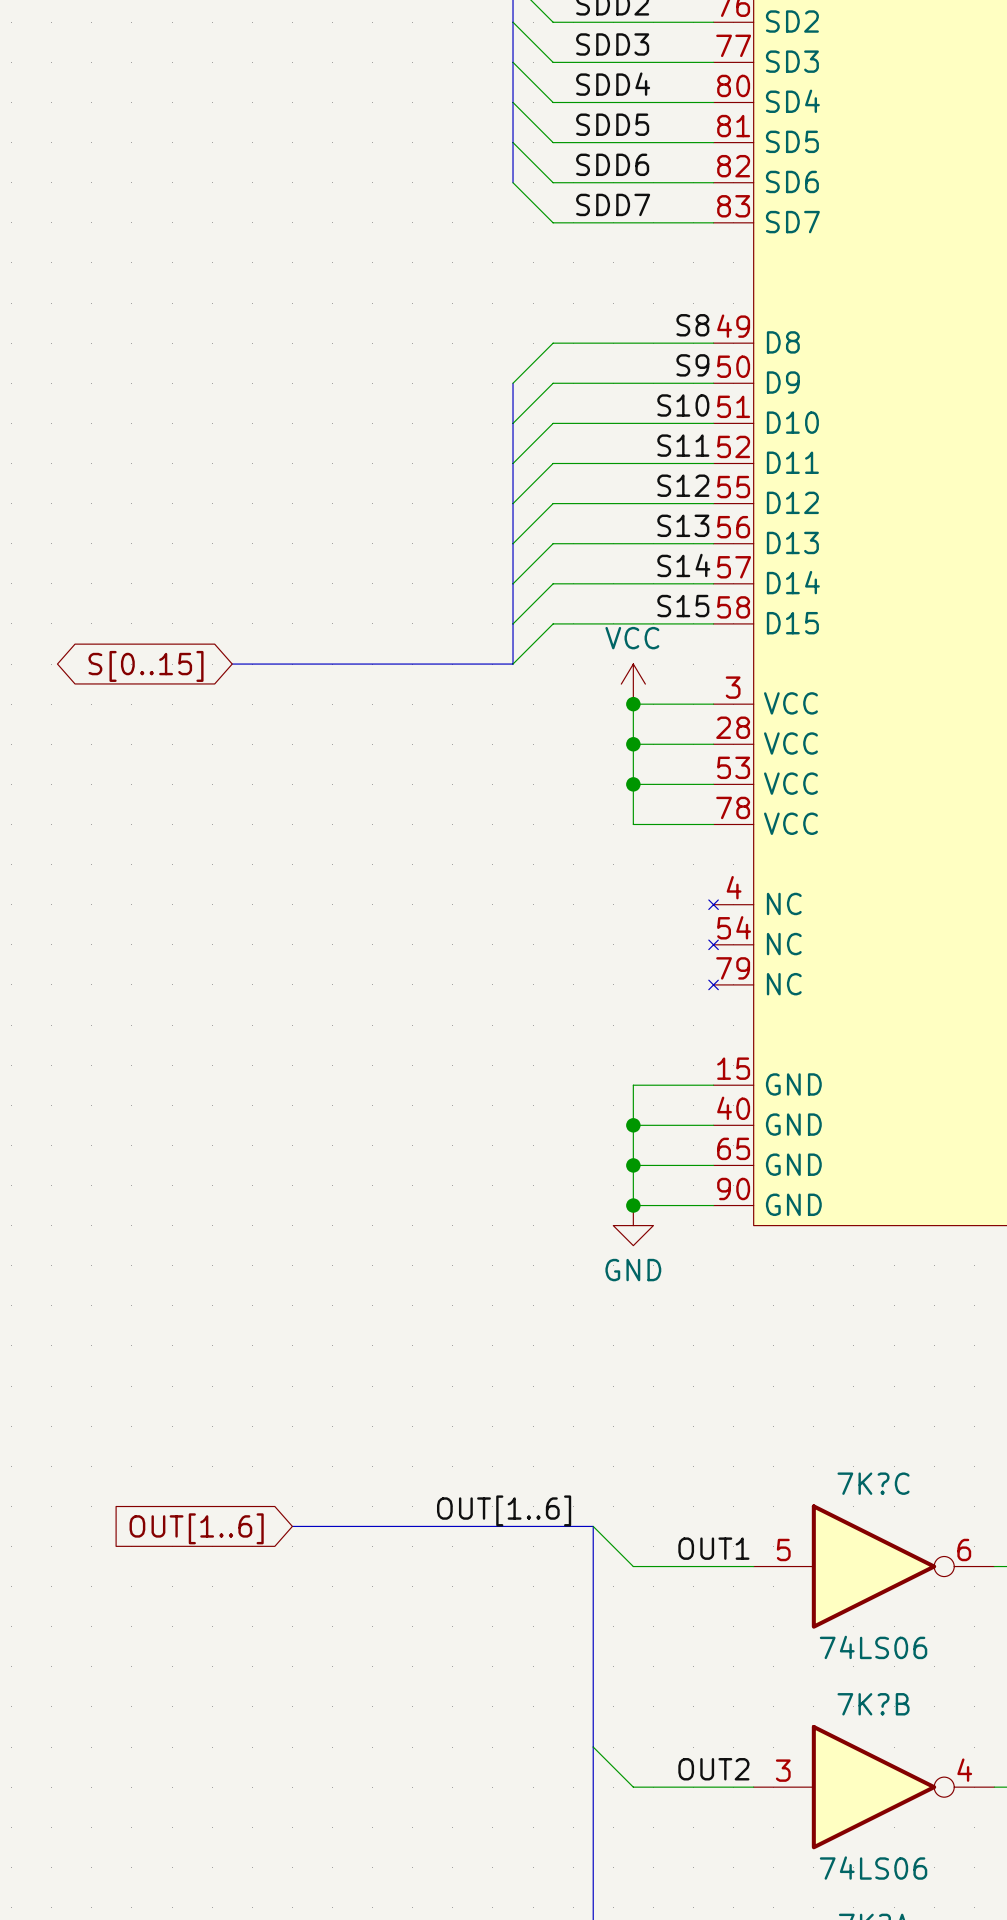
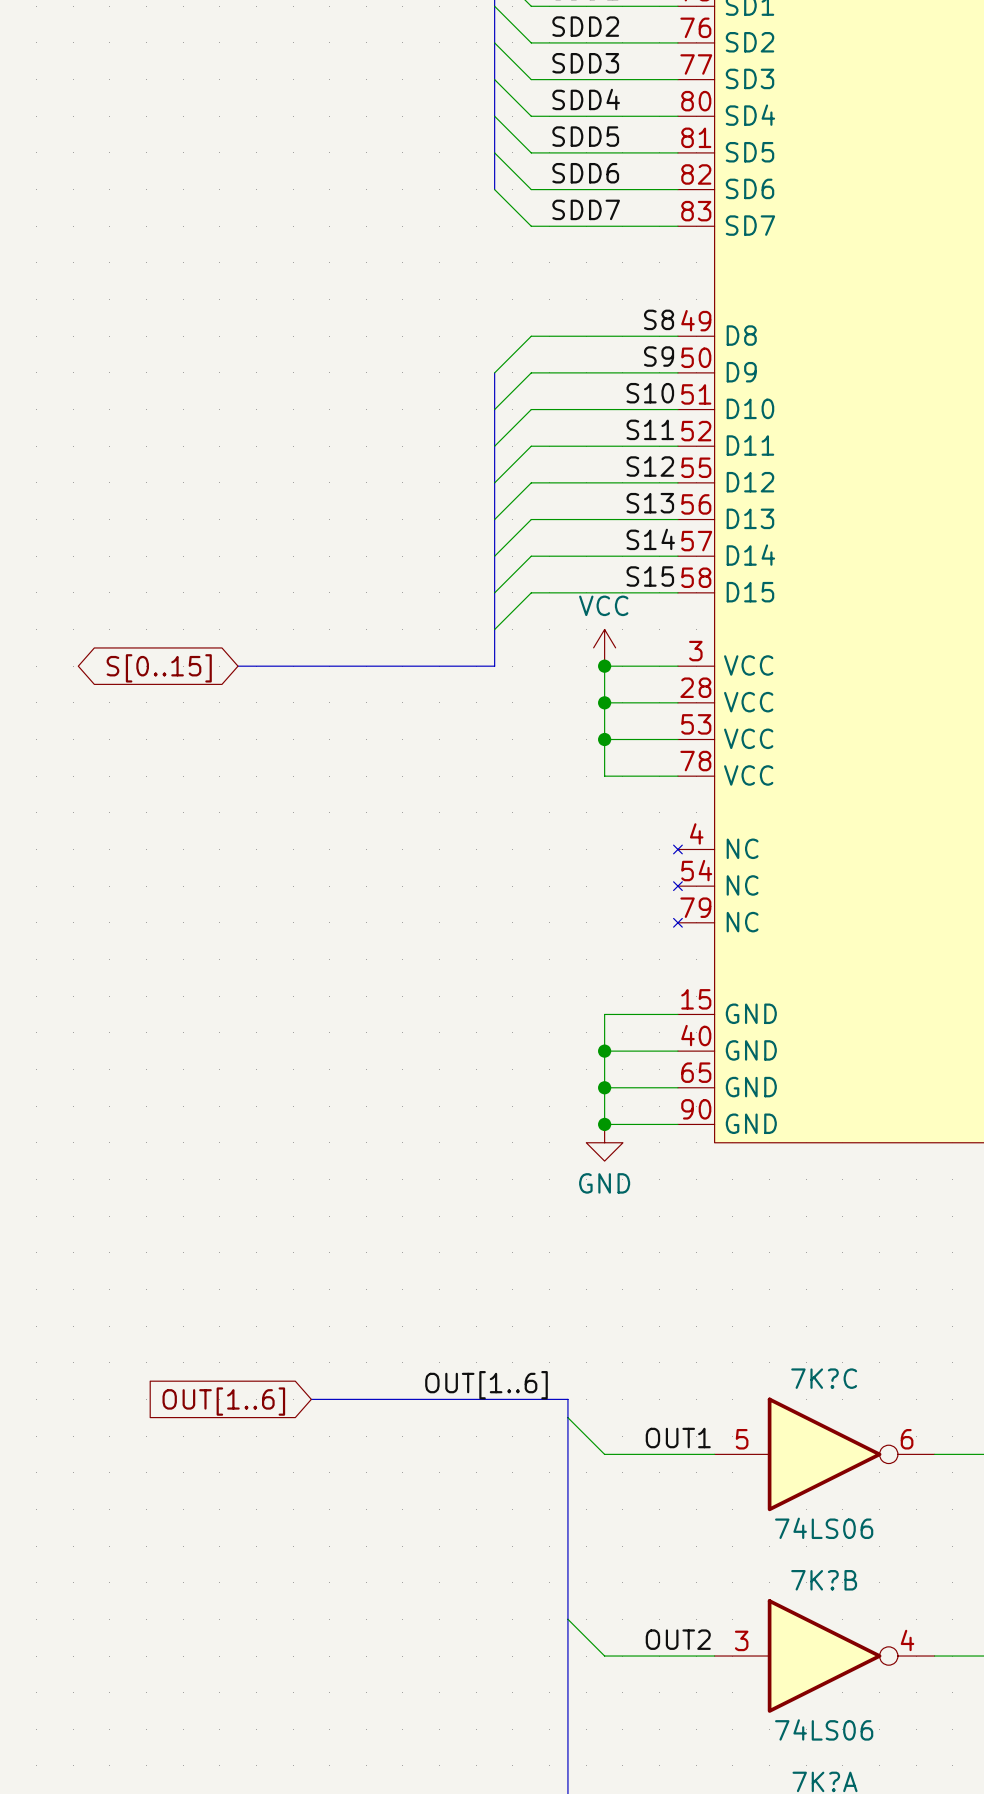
bus: (232, 664) (513, 664) -> (238, 666) (494, 666) (494, 629)
global label position: S[0..15] (146, 666) -> S[0..15] (159, 668)
label position: OUT[1..6] (504, 1510) -> OUT[1..6] (486, 1385)
bus: (292, 1526) (593, 1526) -> (311, 1399) (567, 1399) (567, 1417)
global label position: OUT[1..6] (196, 1528) -> OUT[1..6] (223, 1401)

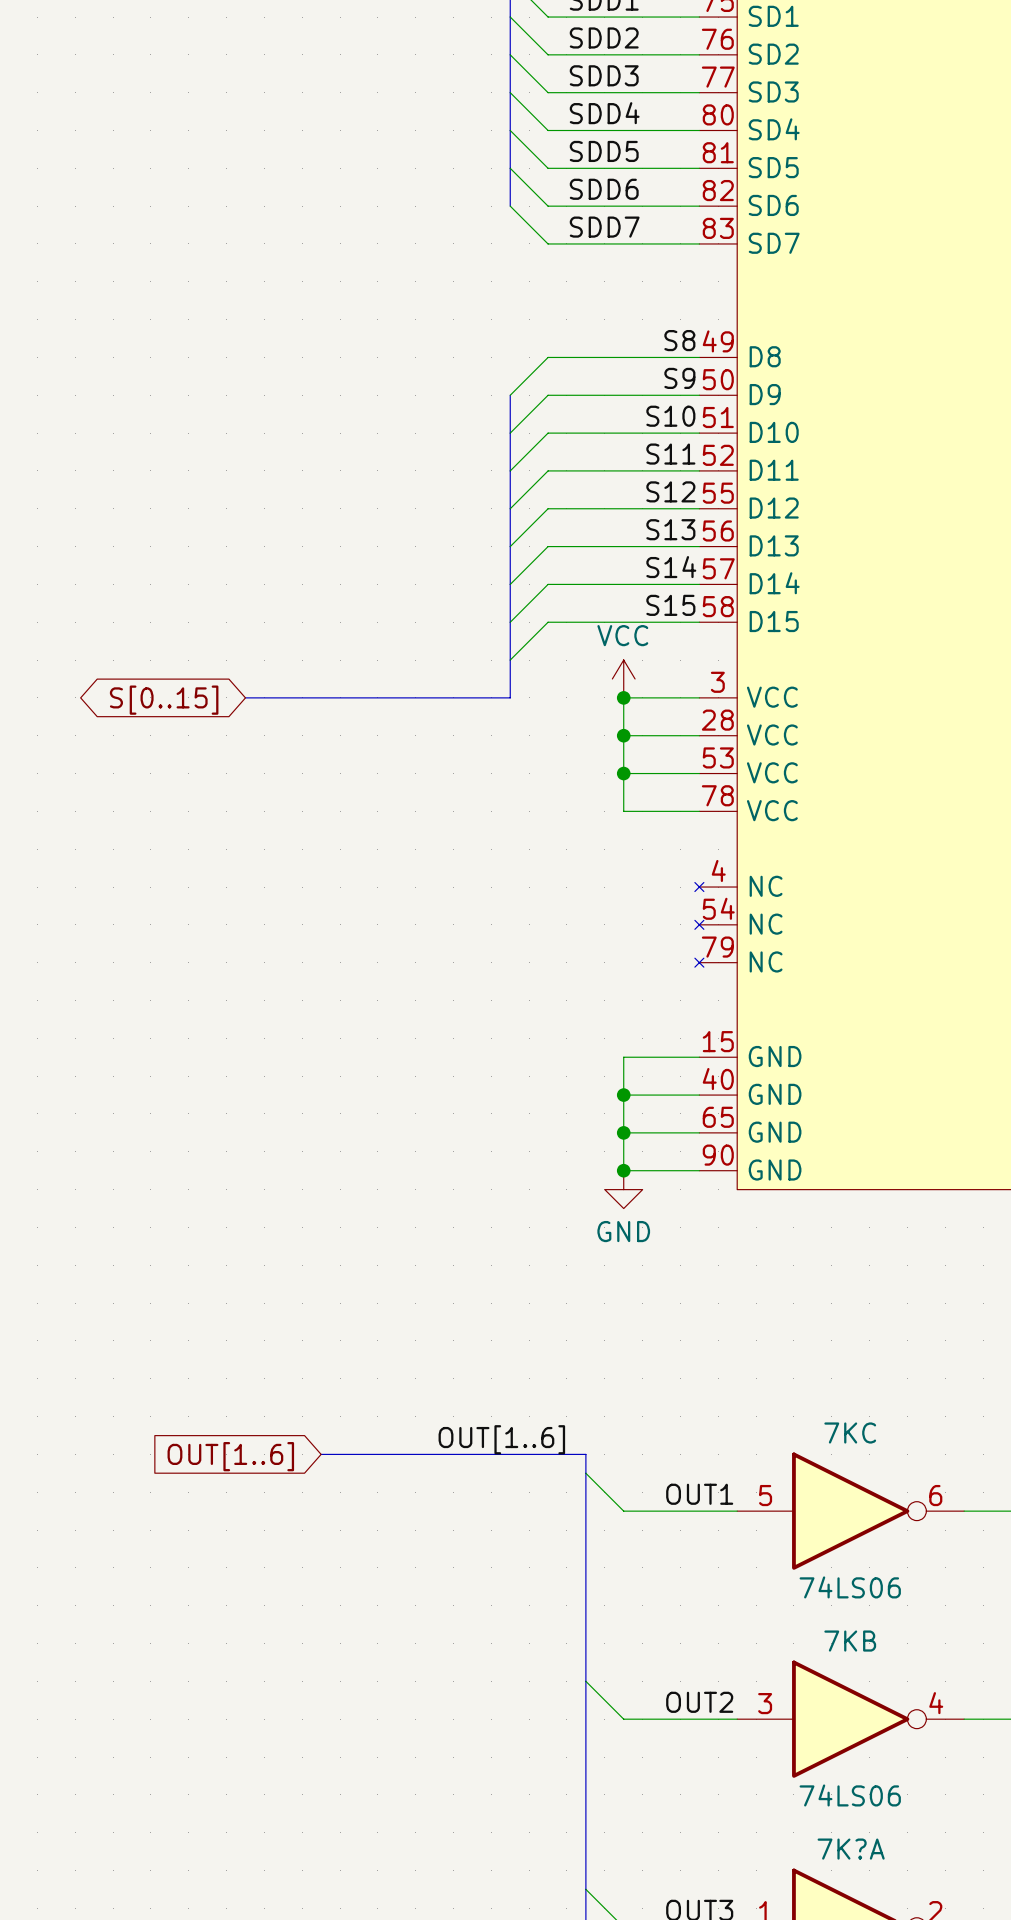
7K?C name: 7K?C (824, 1378) -> 7KC (850, 1432)
7K?B name: 7K?B (824, 1580) -> 7KB (850, 1641)

